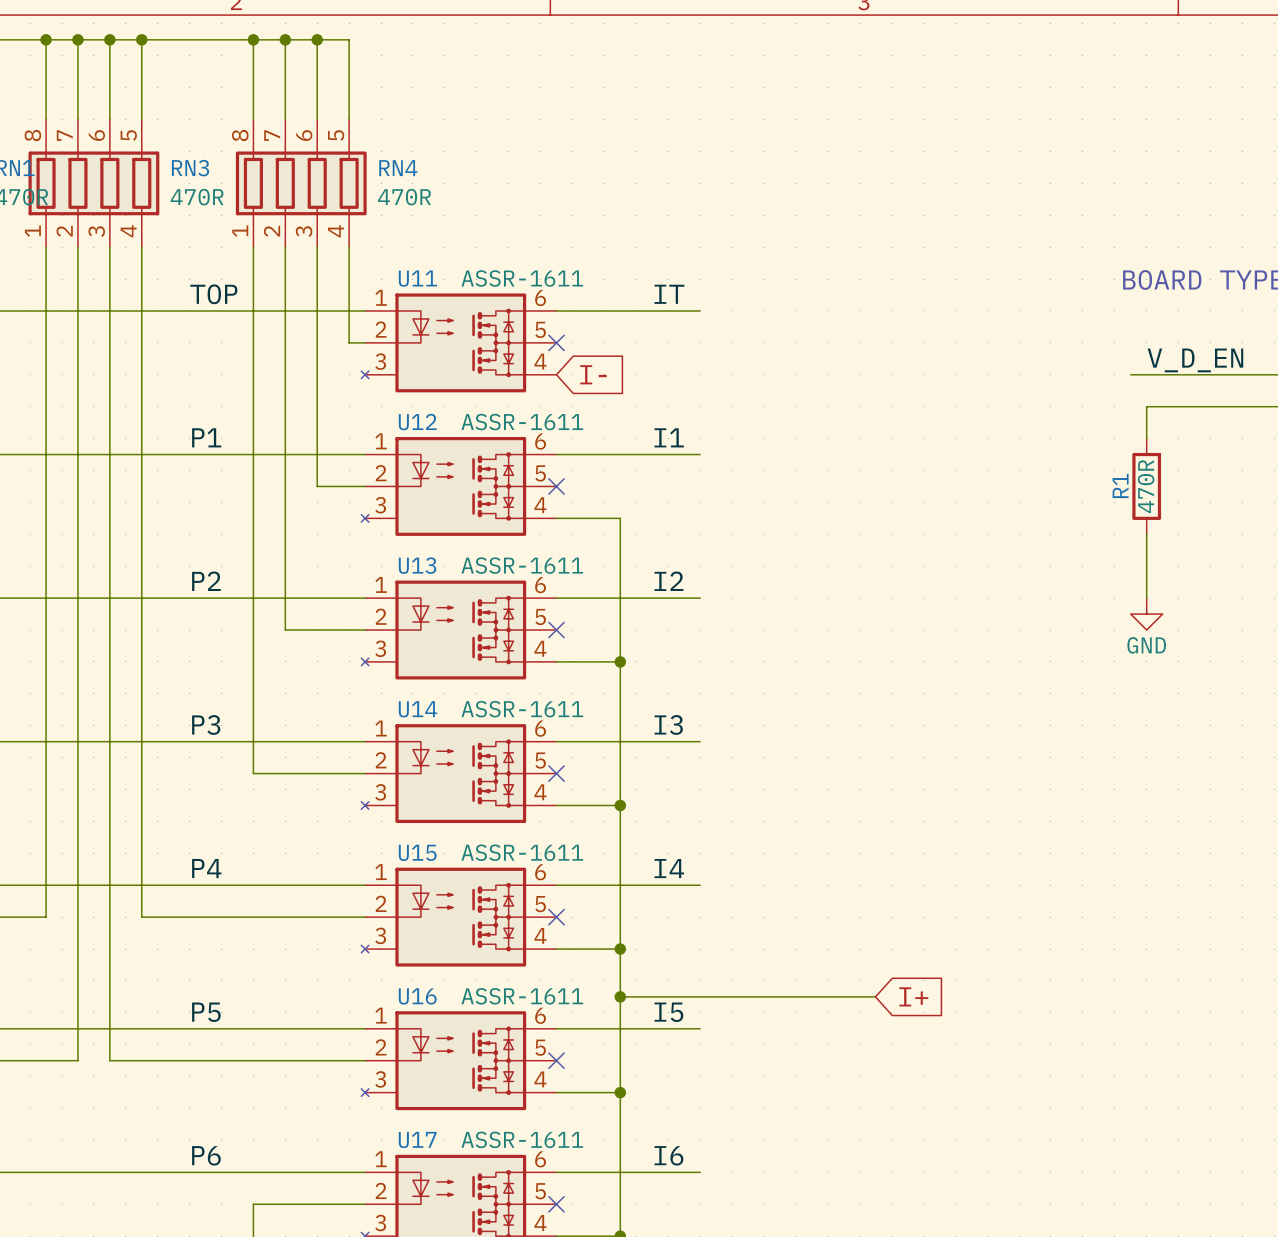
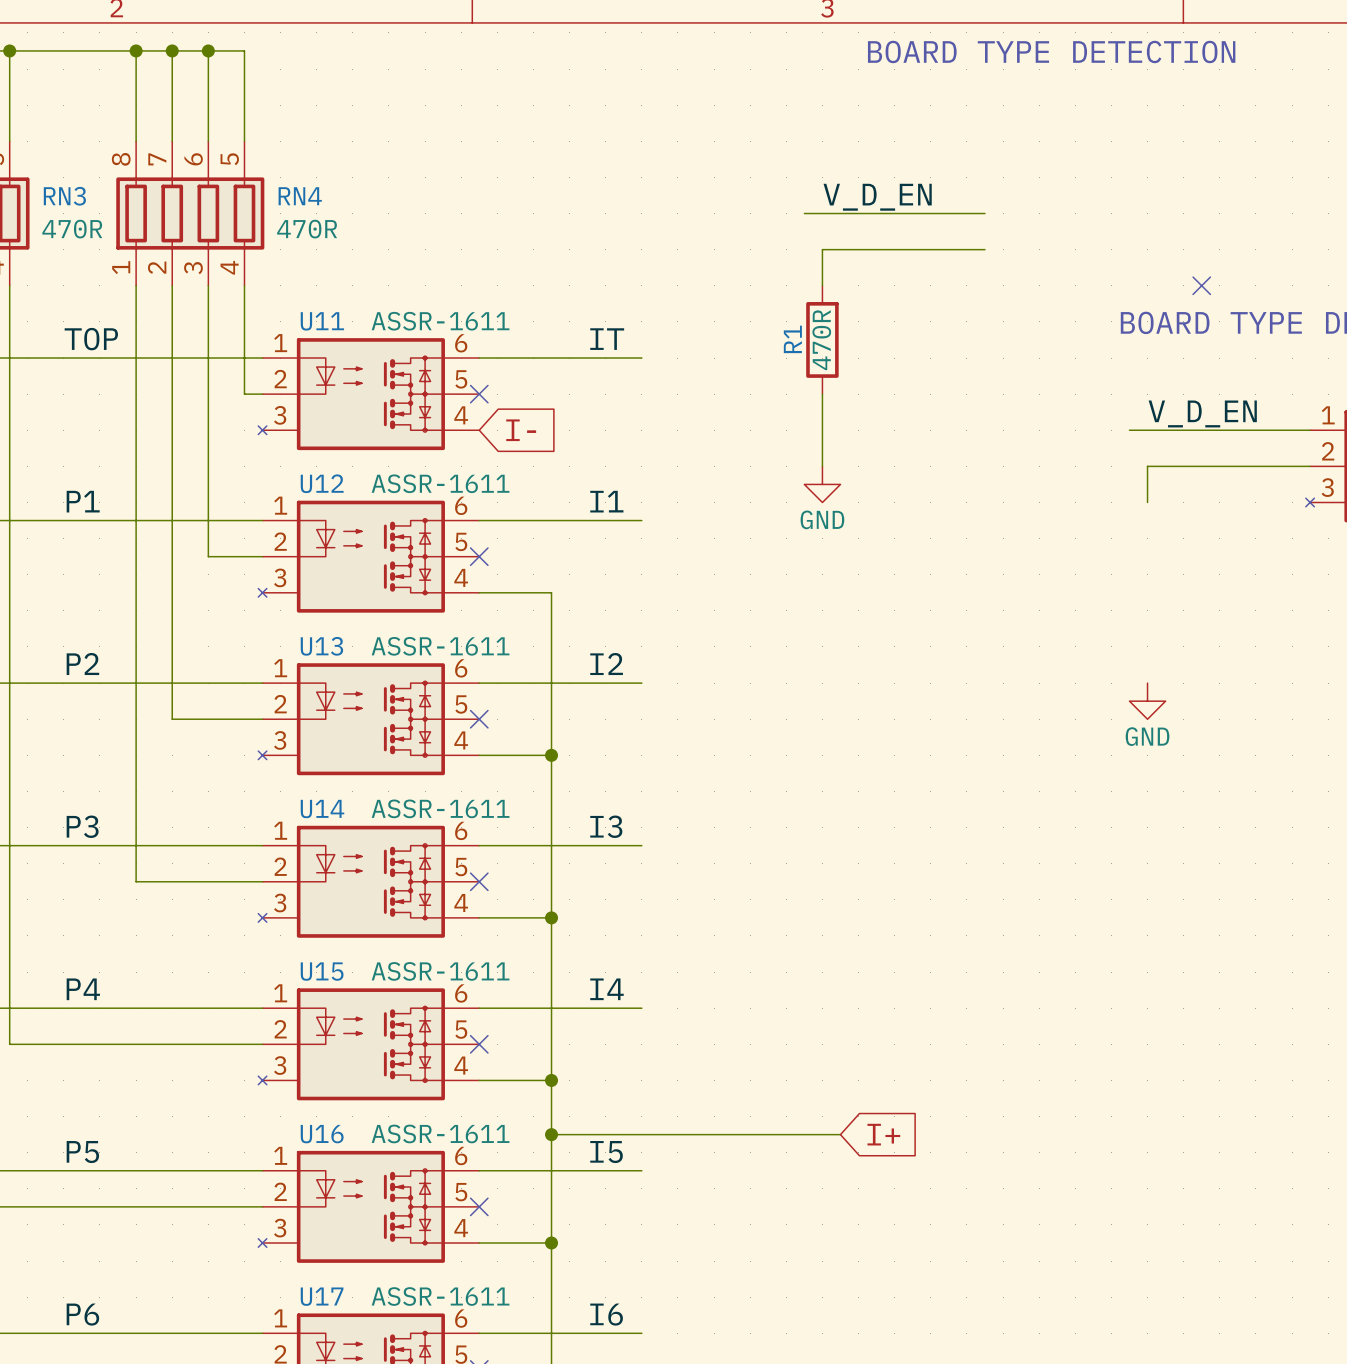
text: none -> BOARD TYPE DETECTION (1051, 51)
label: none -> V_D_EN (877, 197)
wire: none -> (804, 213) (984, 213)
wire: none -> (984, 249) (822, 249) (822, 285)
no-connect mark: none -> (1201, 285)
wire: none -> (822, 394) (822, 466)
power symbol: none -> GND (822, 484)
R1 position: (1146, 486) -> (822, 339)
wire: (1146, 534) (1146, 598) -> none

